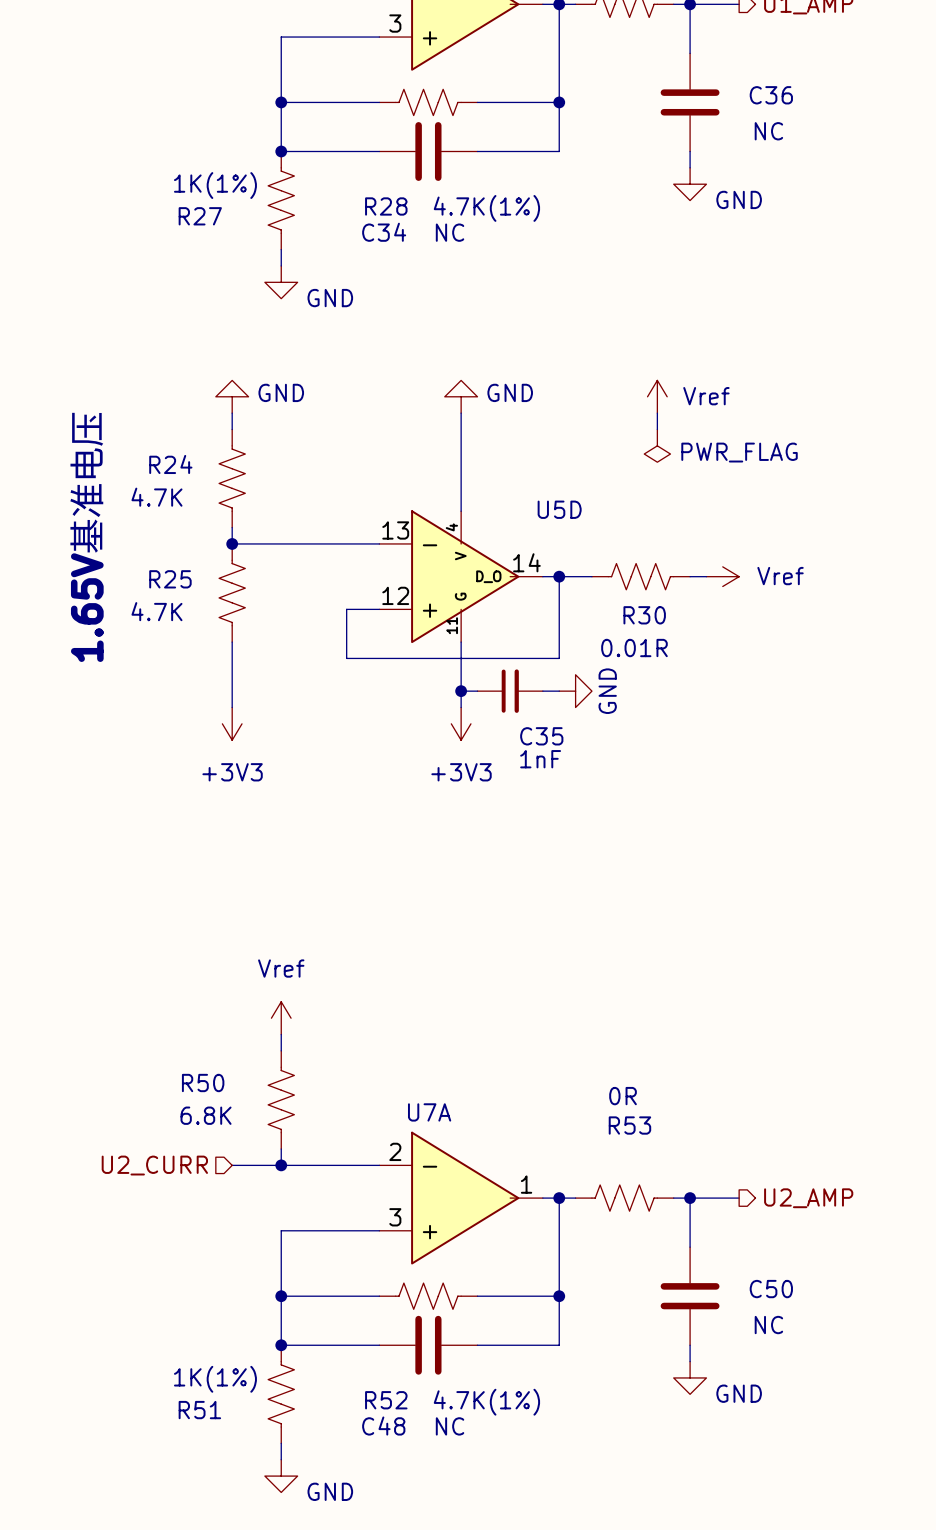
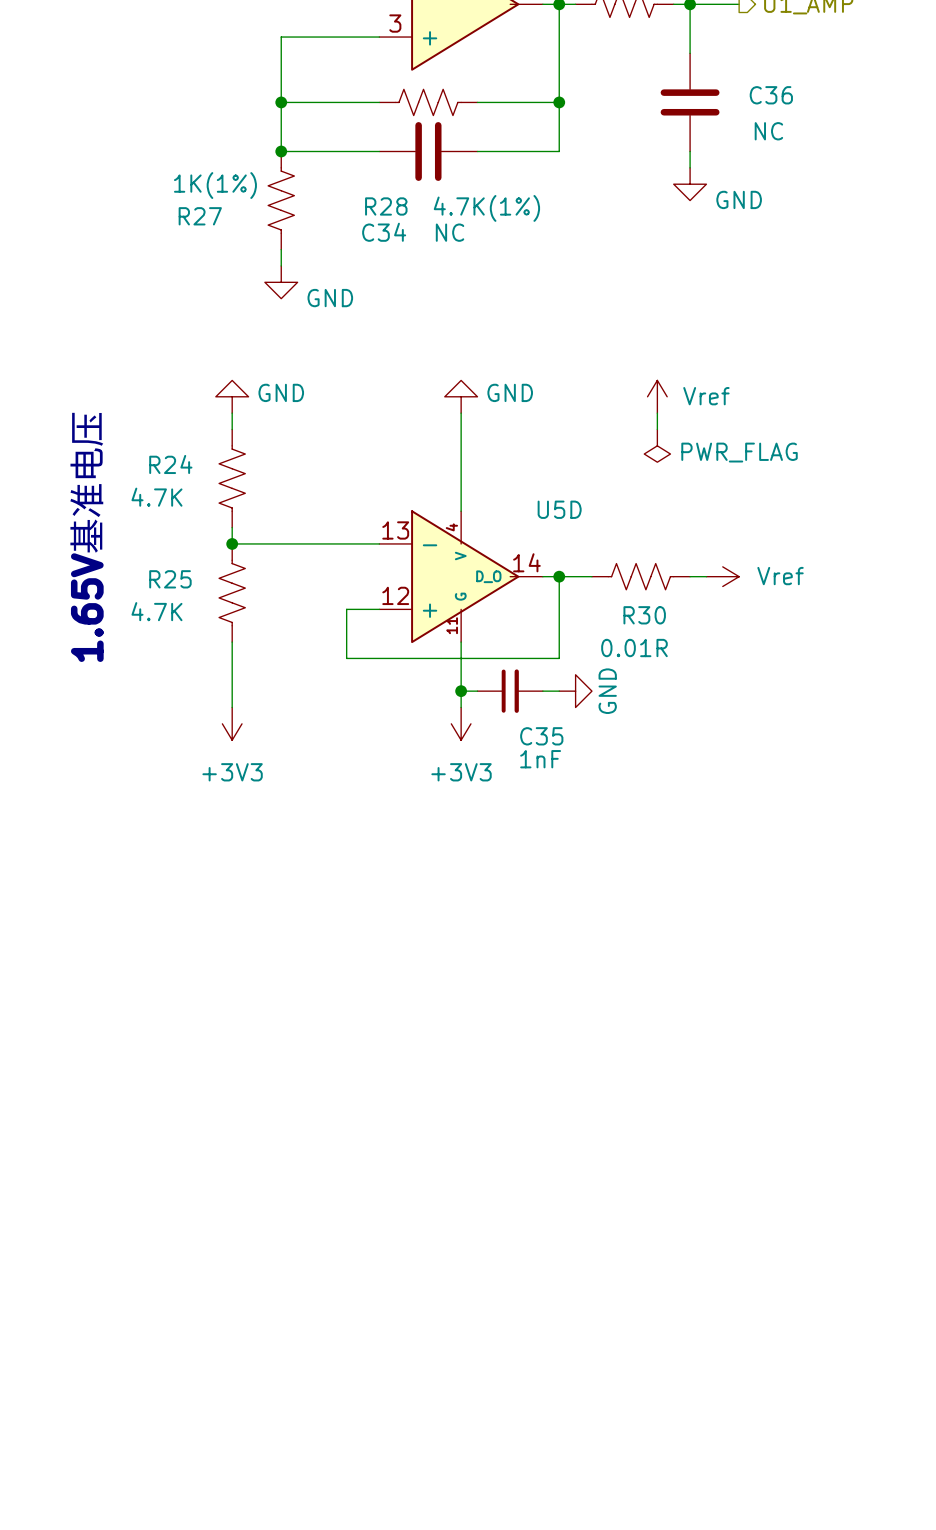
power symbol: Vref (281, 1018) -> none
wire: (281, 1034) (281, 1050) -> none
R50: 6.8K (281, 1099) -> none
wire: (281, 1149) (281, 1165) -> none
hierarchical label: U2_CURR (154, 1165) -> none
wire: (232, 1165) (379, 1165) -> none
junction: (281, 1165) -> none
U7A: (461, 1198) -> none
wire: (542, 1198) (575, 1198) -> none
wire: (559, 1198) (559, 1345) (477, 1345) -> none
junction: (559, 1198) -> none
R53: 0R (624, 1198) -> none
wire: (673, 1198) (739, 1198) -> none
wire: (690, 1198) (690, 1247) -> none
junction: (690, 1198) -> none
hierarchical label: U2_AMP (808, 1198) -> none
wire: (379, 1230) (281, 1230) (281, 1345) (379, 1345) -> none
wire: (281, 1296) (379, 1296) -> none
junction: (281, 1296) -> none
R52: 4.7K(1%) (428, 1296) -> none
wire: (477, 1296) (559, 1296) -> none
junction: (559, 1296) -> none
C50: NC (690, 1296) -> none
junction: (281, 1345) -> none
C48: NC (428, 1345) -> none
wire: (690, 1345) (690, 1361) -> none
power symbol: GND (690, 1377) -> none
R51: 1K(1%) (281, 1394) -> none
wire: (281, 1443) (281, 1459) -> none
power symbol: GND (281, 1476) -> none

